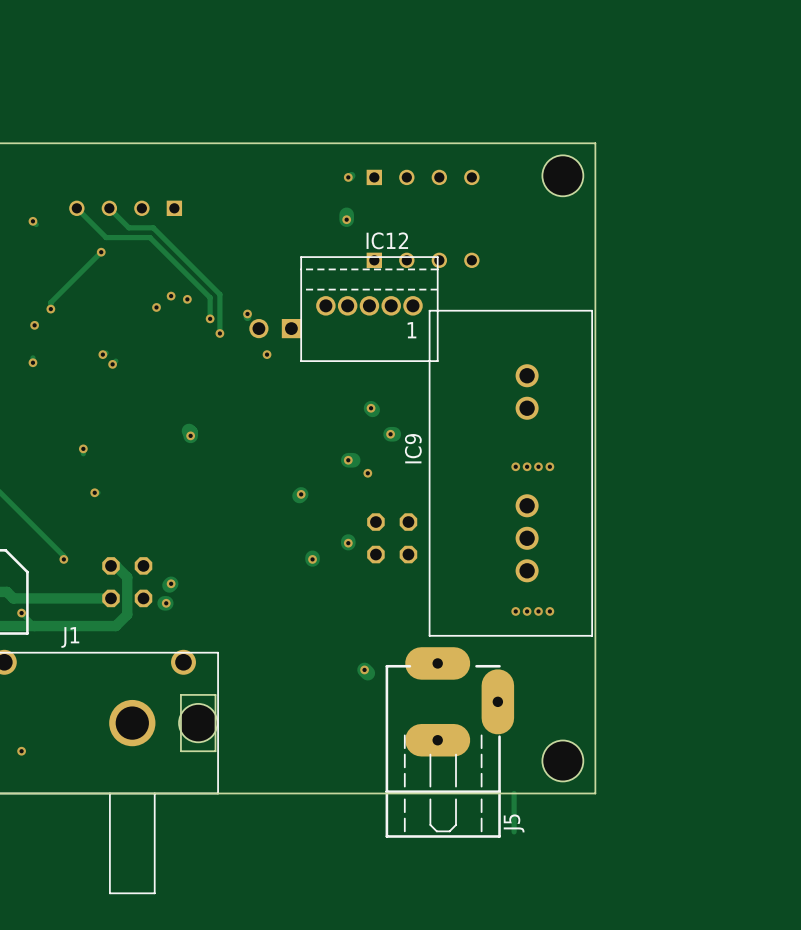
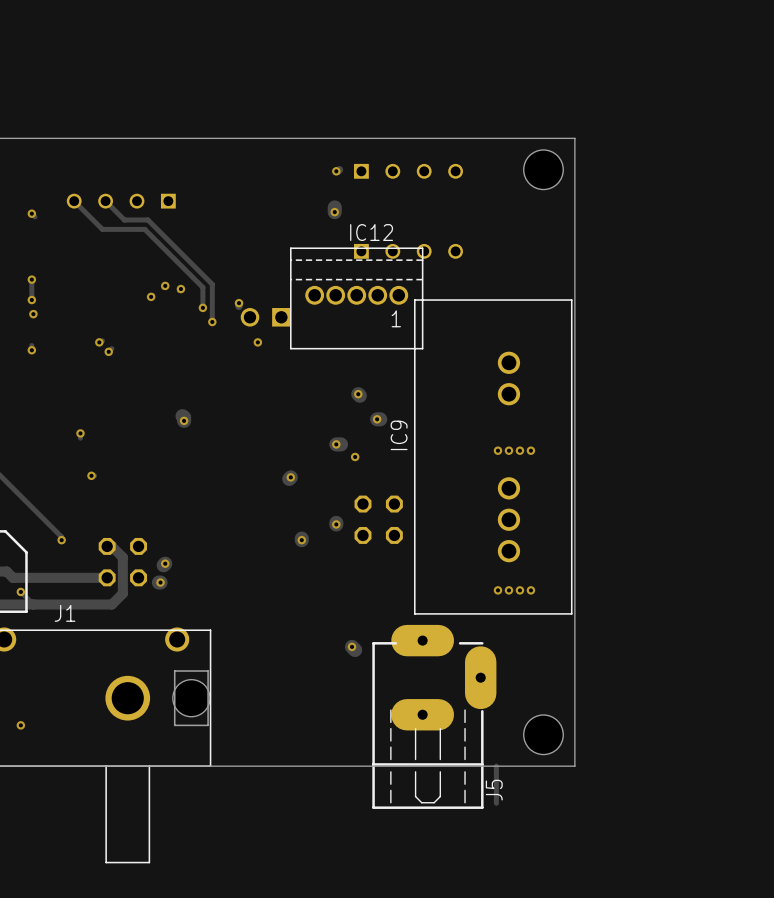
track: (101, 252) (50, 302) (50, 309) -> none
via: (101, 252) -> none
track: none -> (31, 279) (31, 300)
via: none -> (31, 279)
via: (50, 309) -> none
via: none -> (31, 300)

